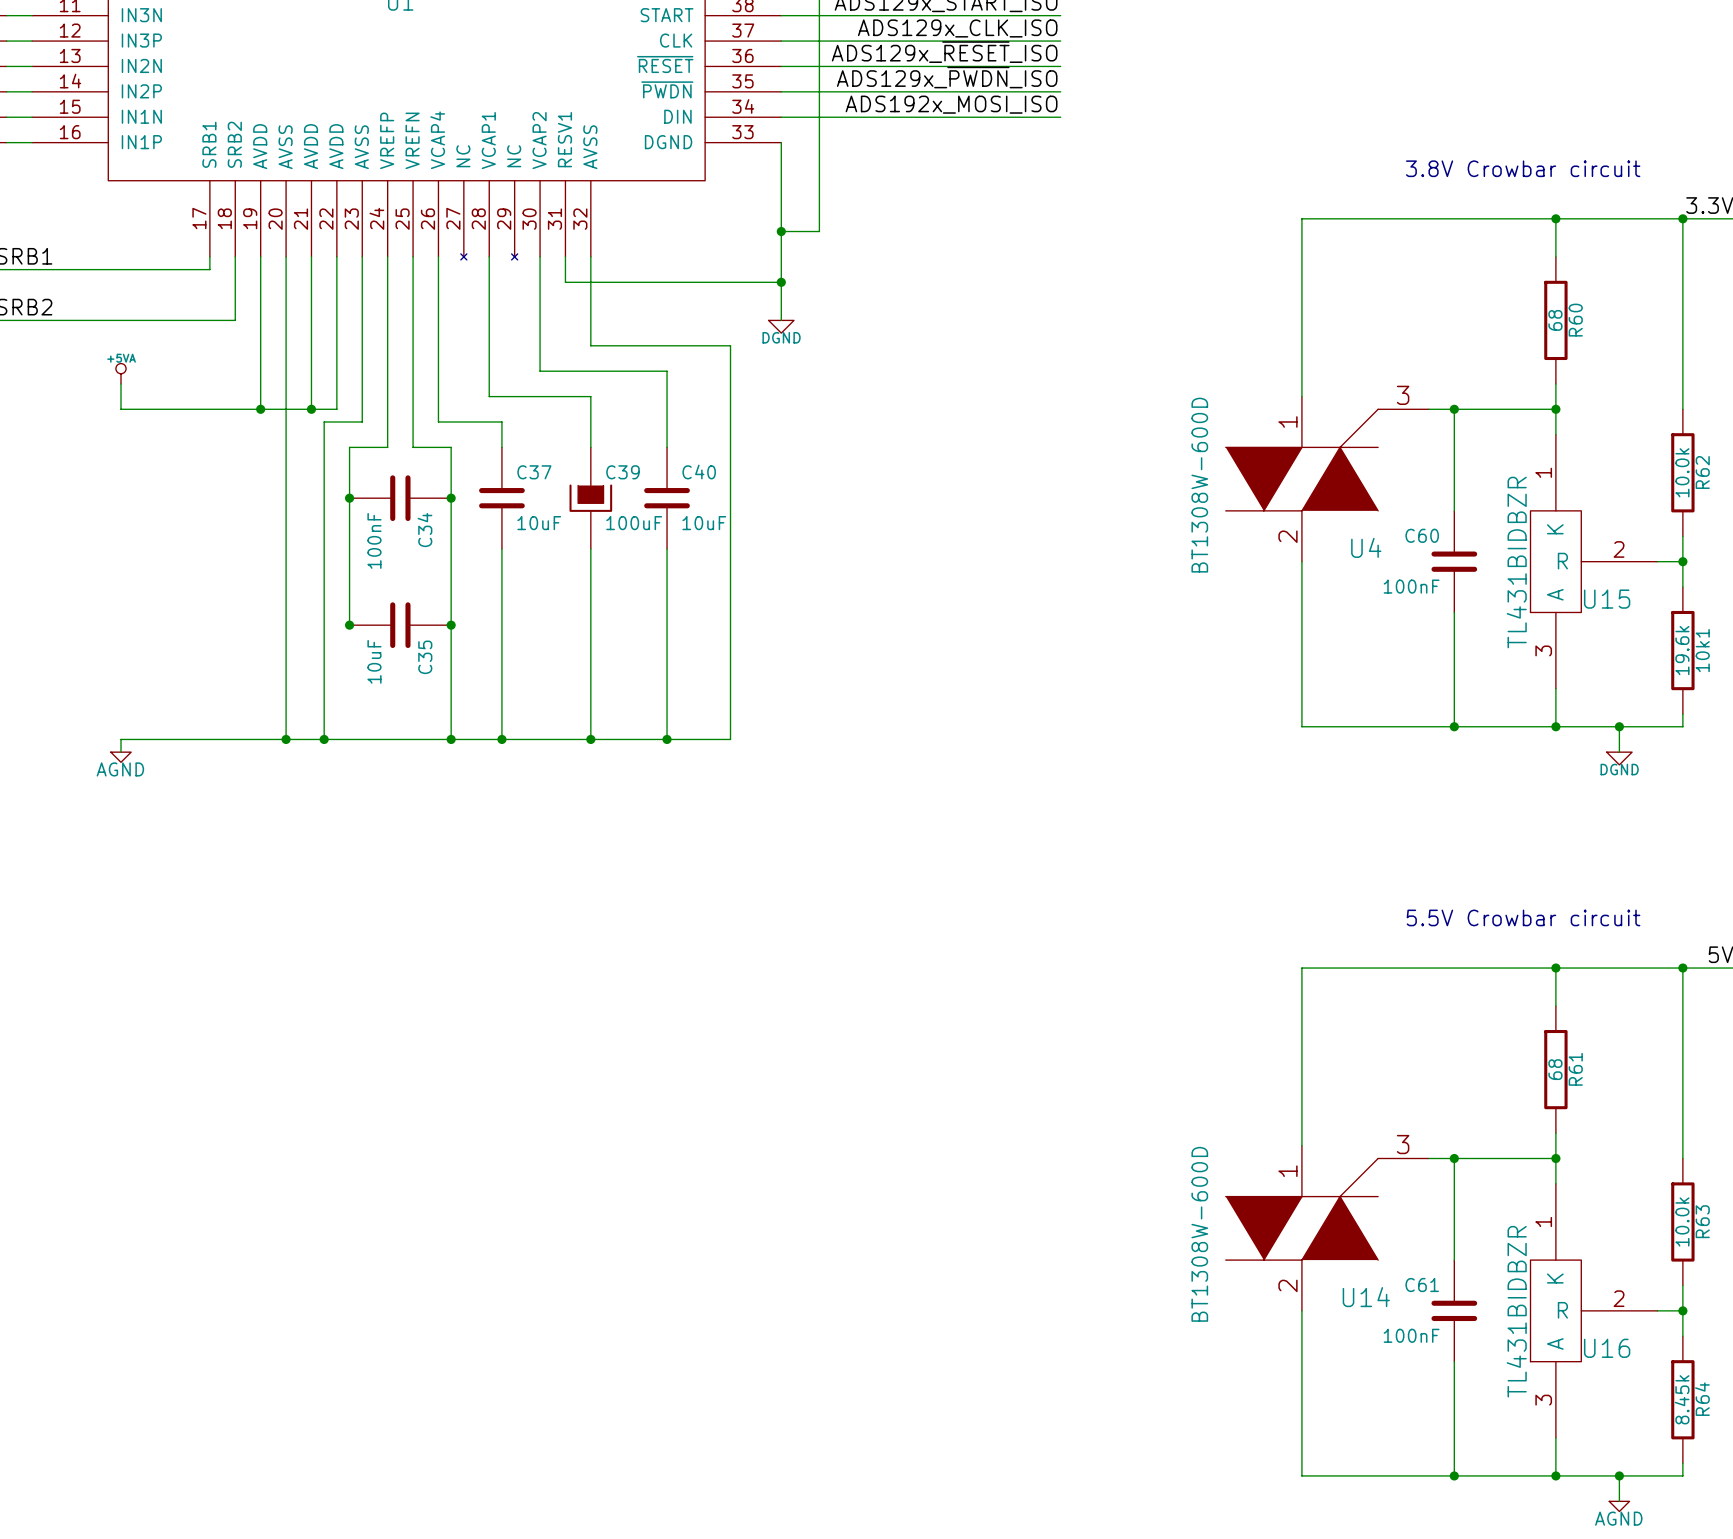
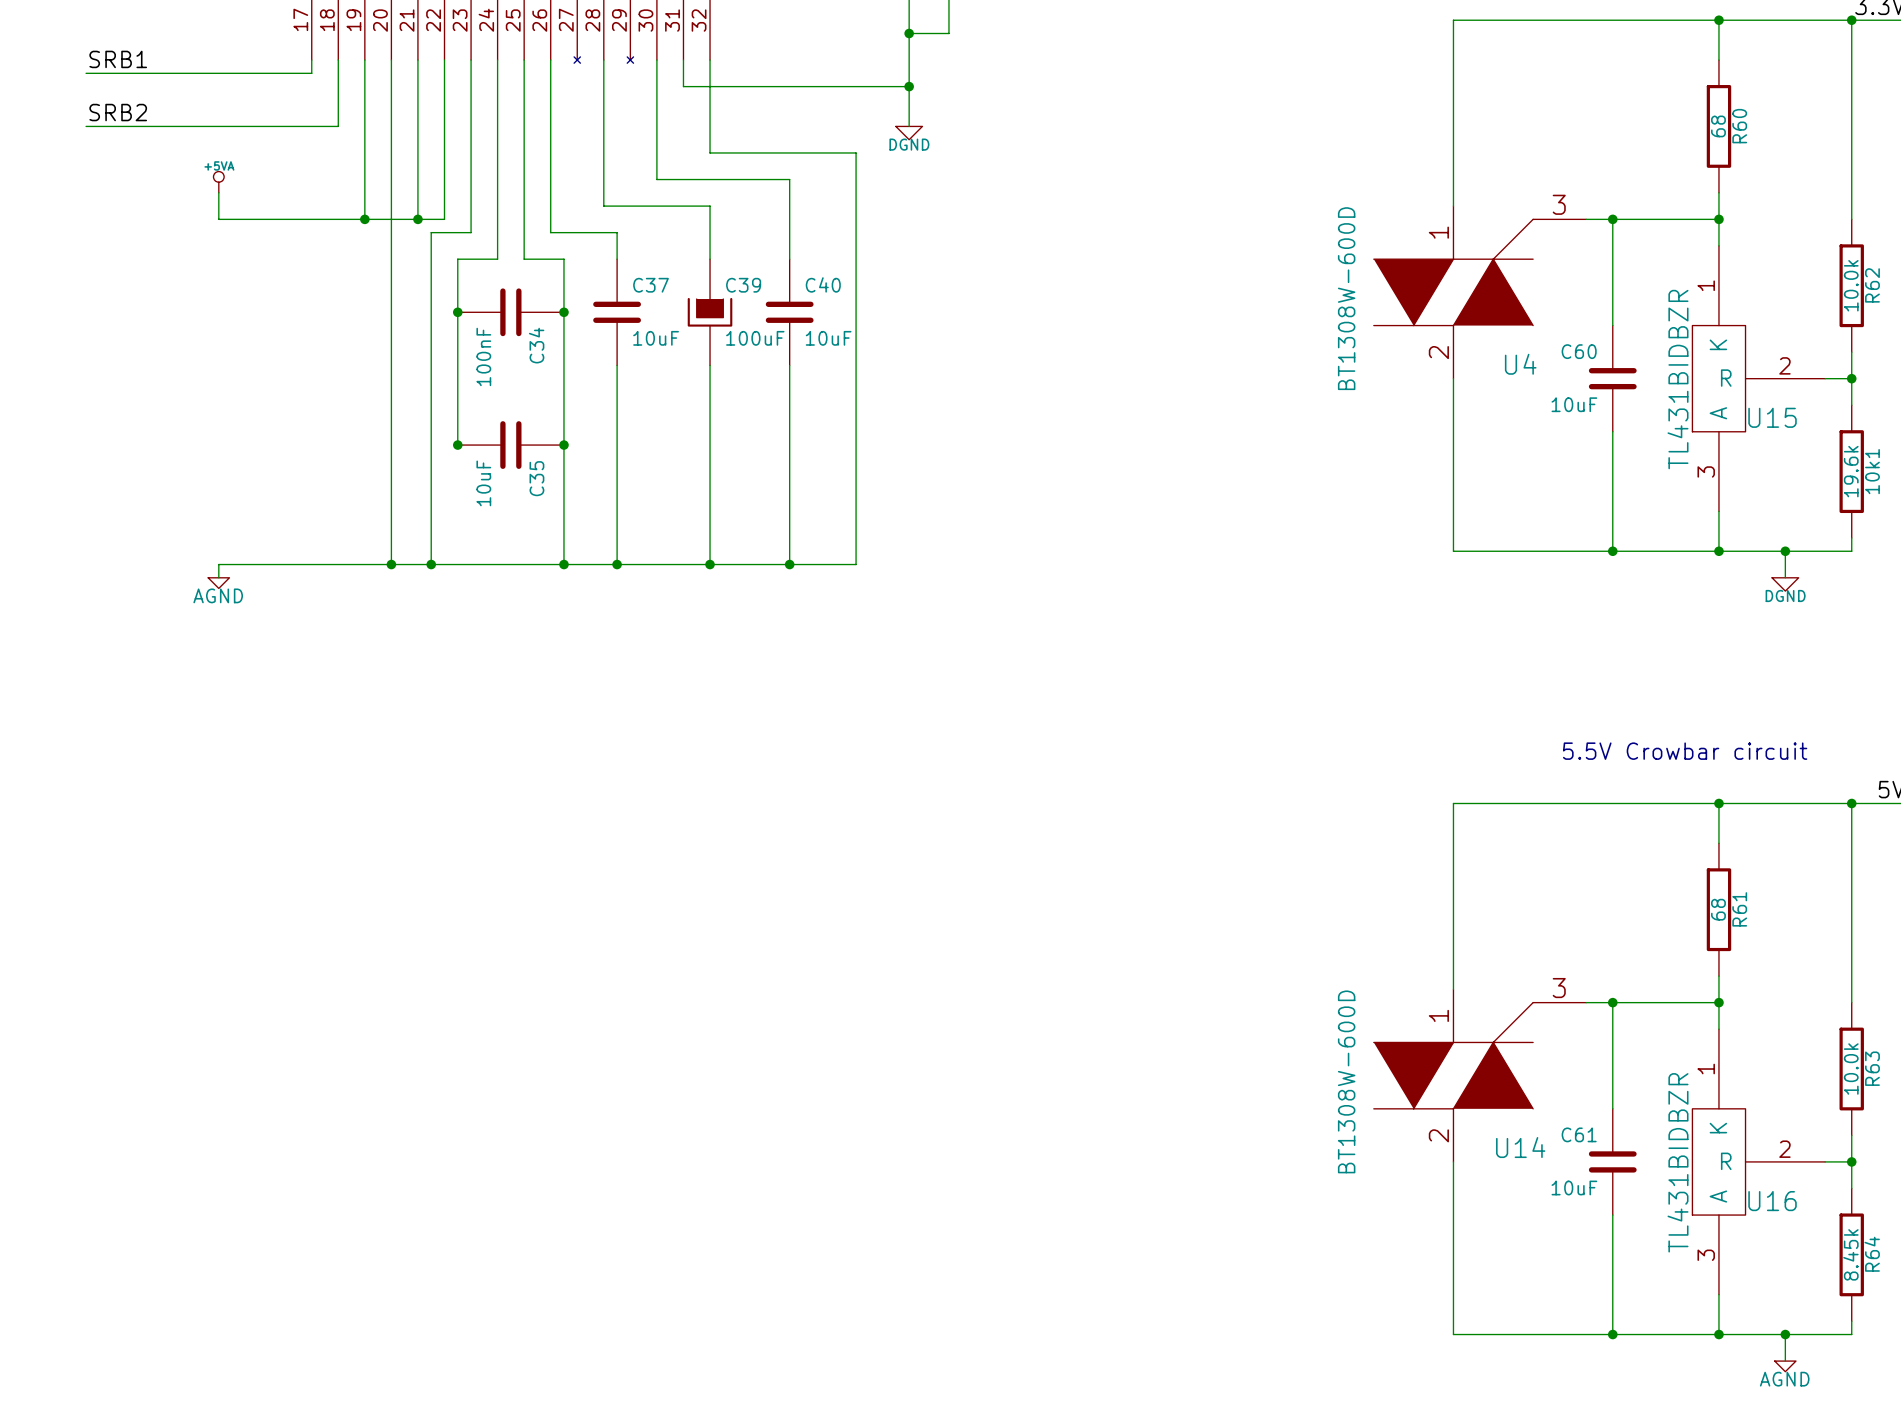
C60 value: 100nF (1411, 586) -> 10uF (1574, 404)
C61 value: 100nF (1411, 1335) -> 10uF (1574, 1187)

